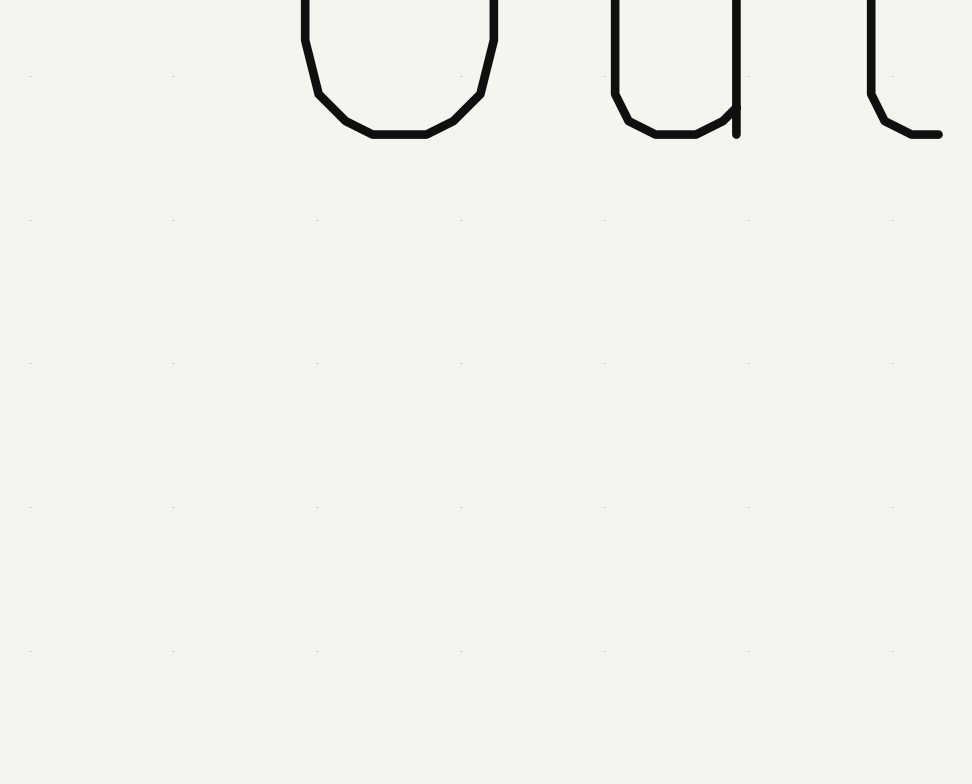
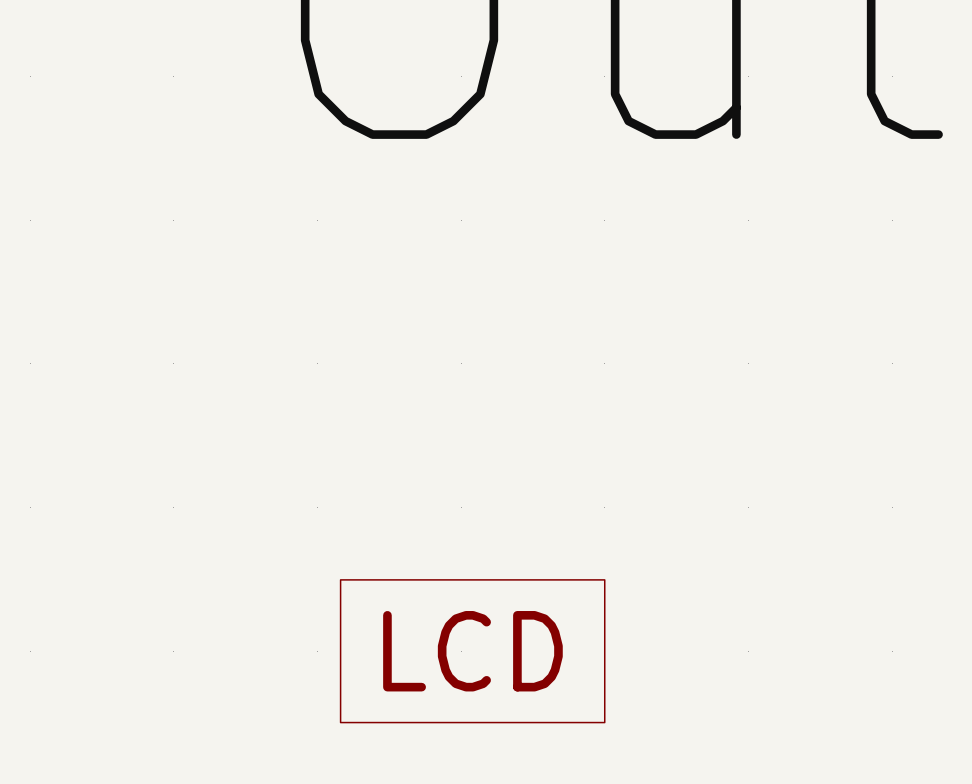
global label: none -> LCD (472, 651)

